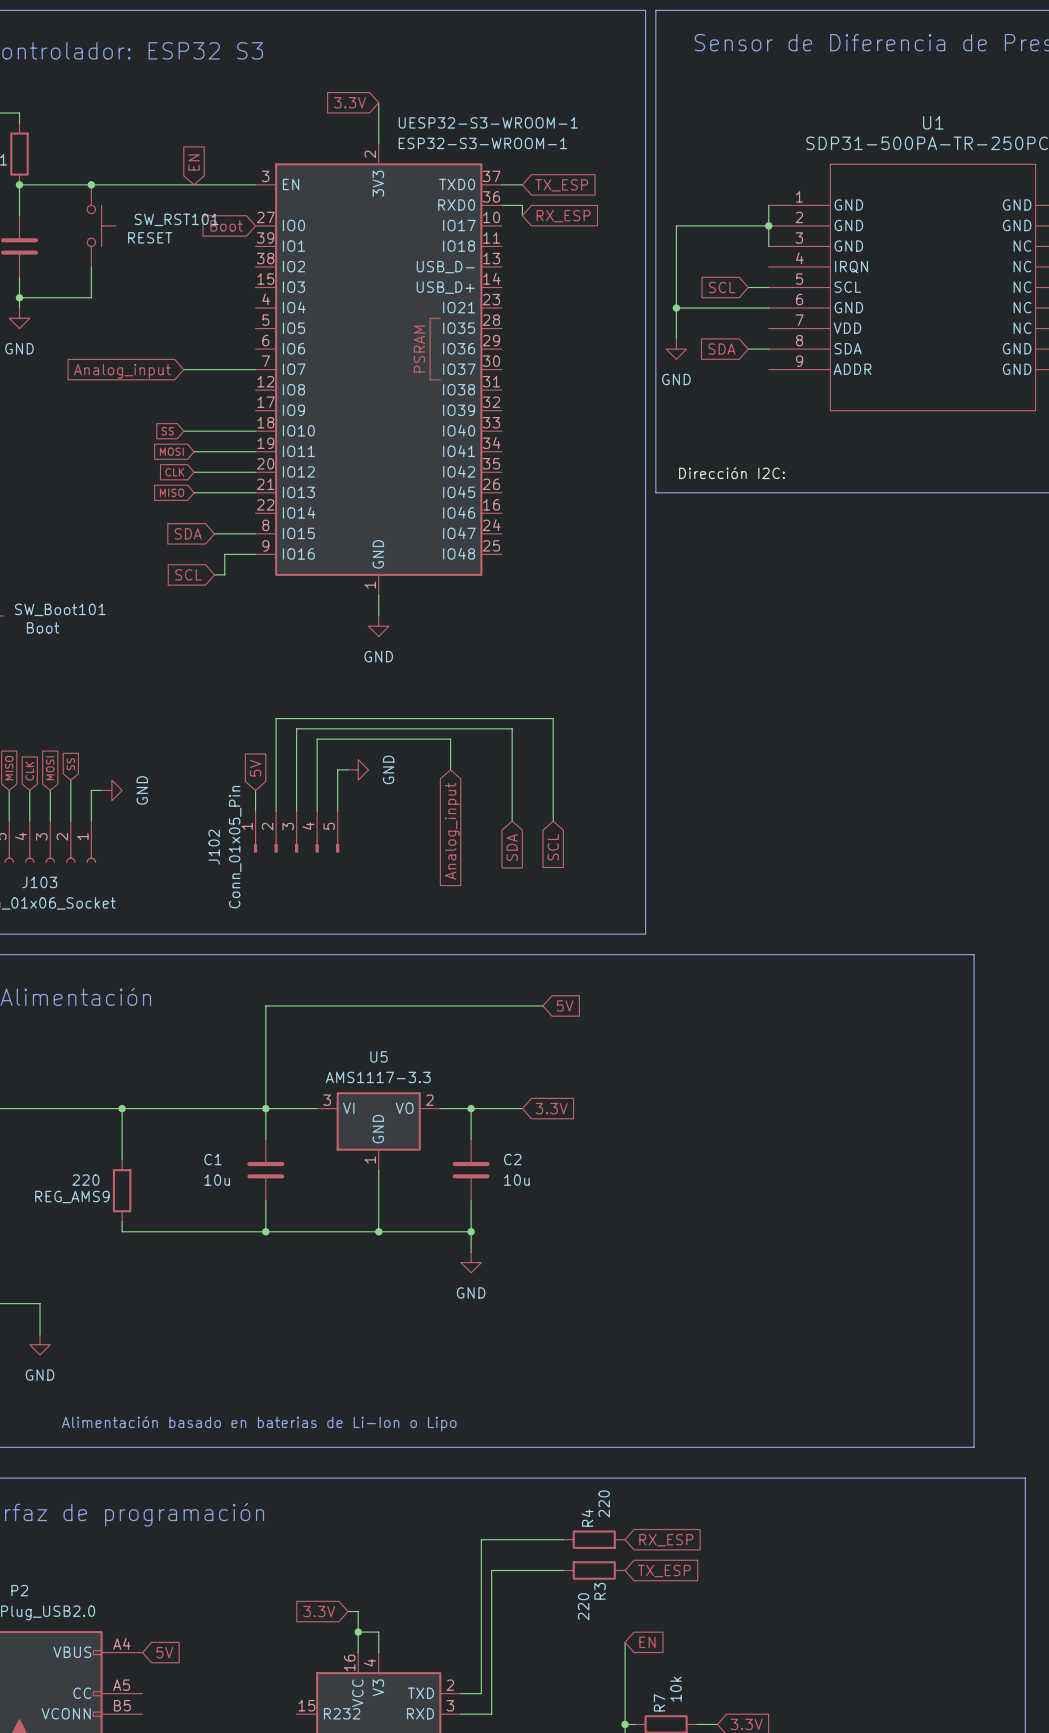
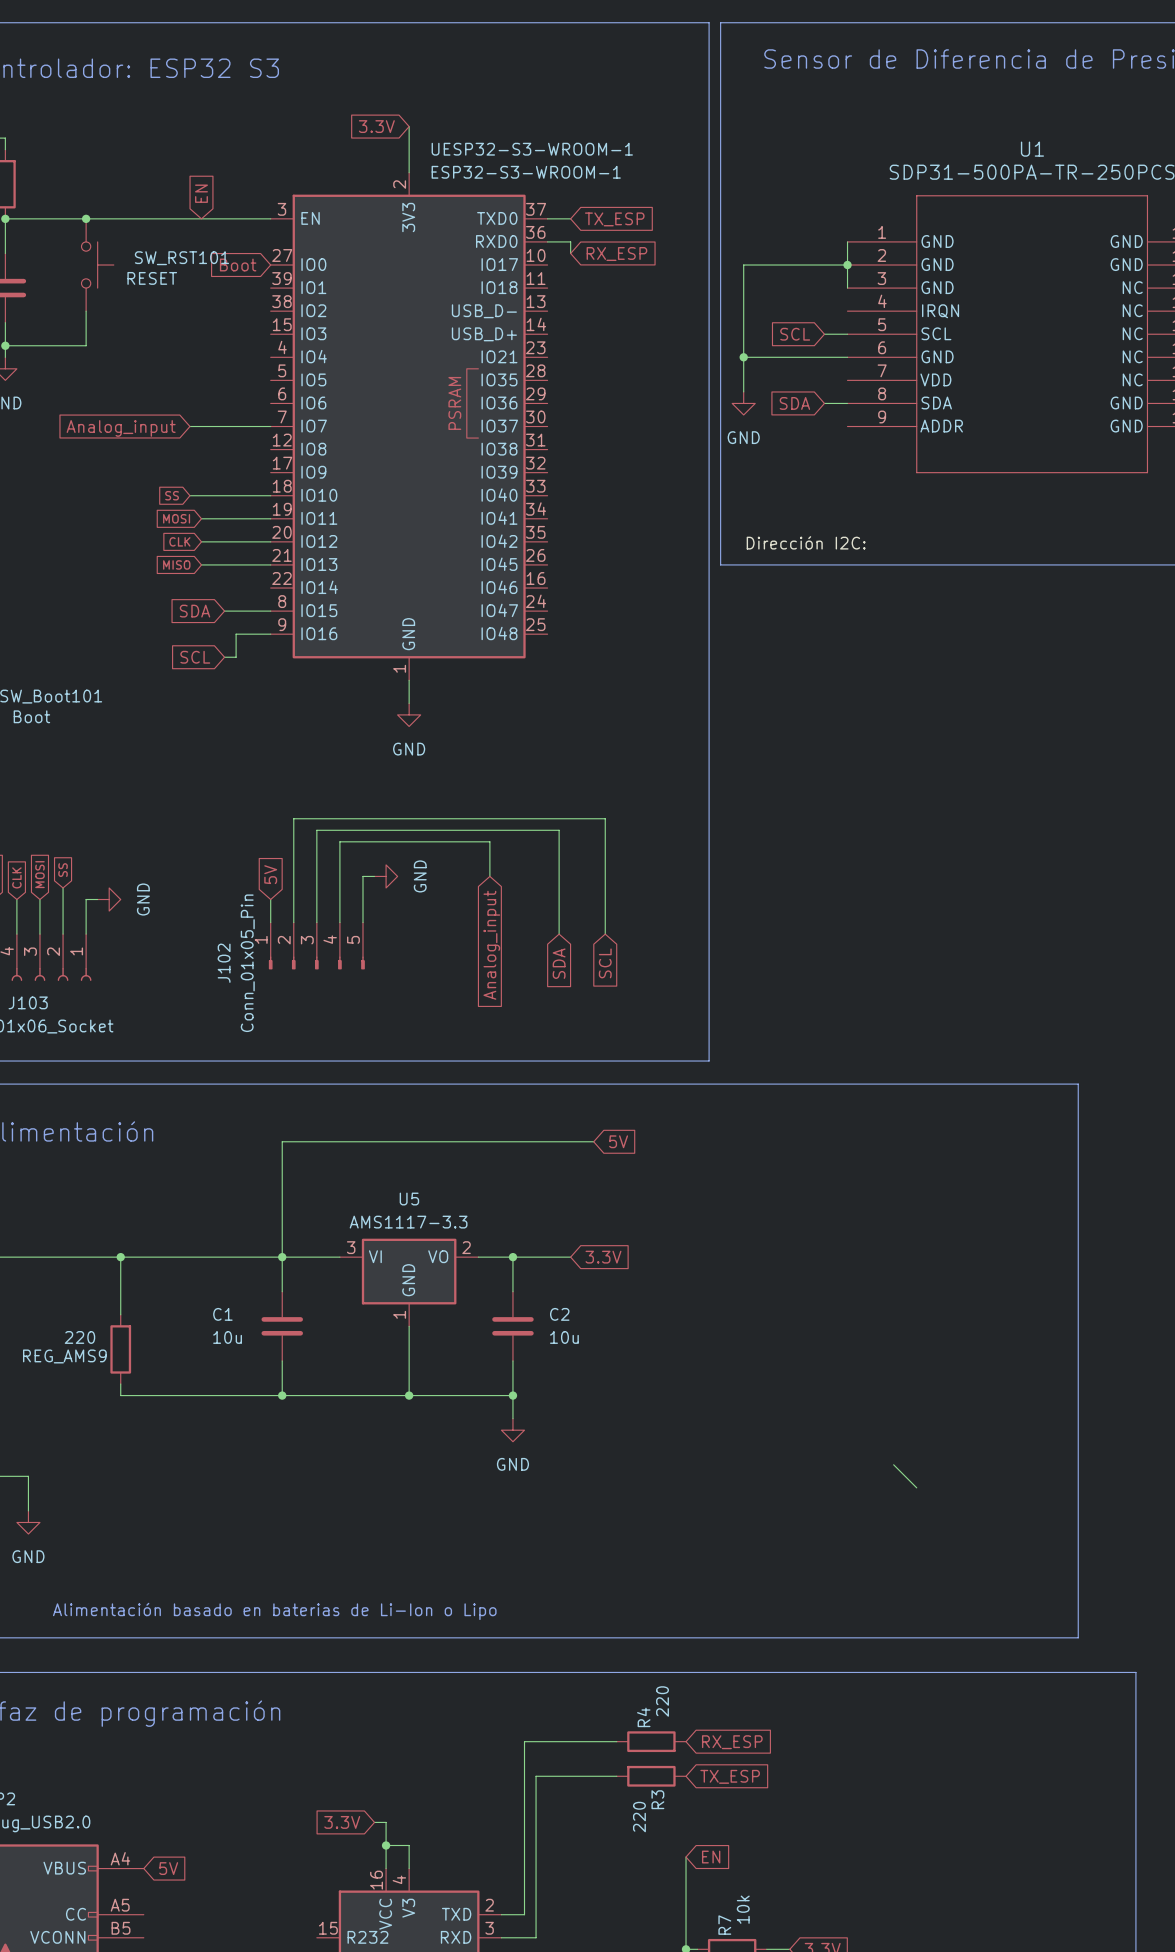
wire: none -> (893, 1464) (916, 1487)

